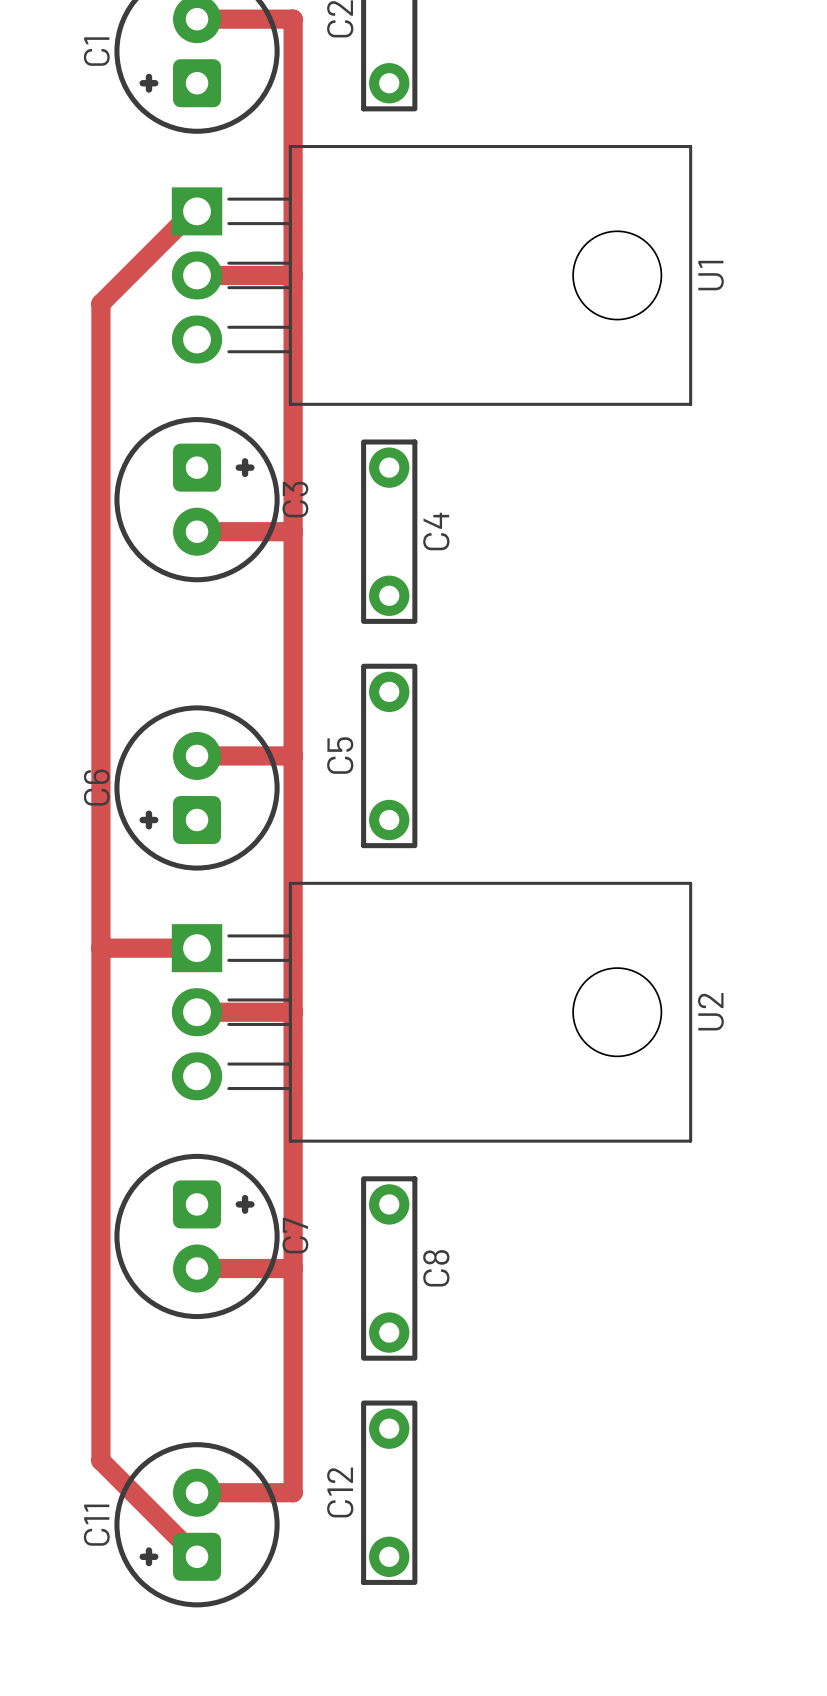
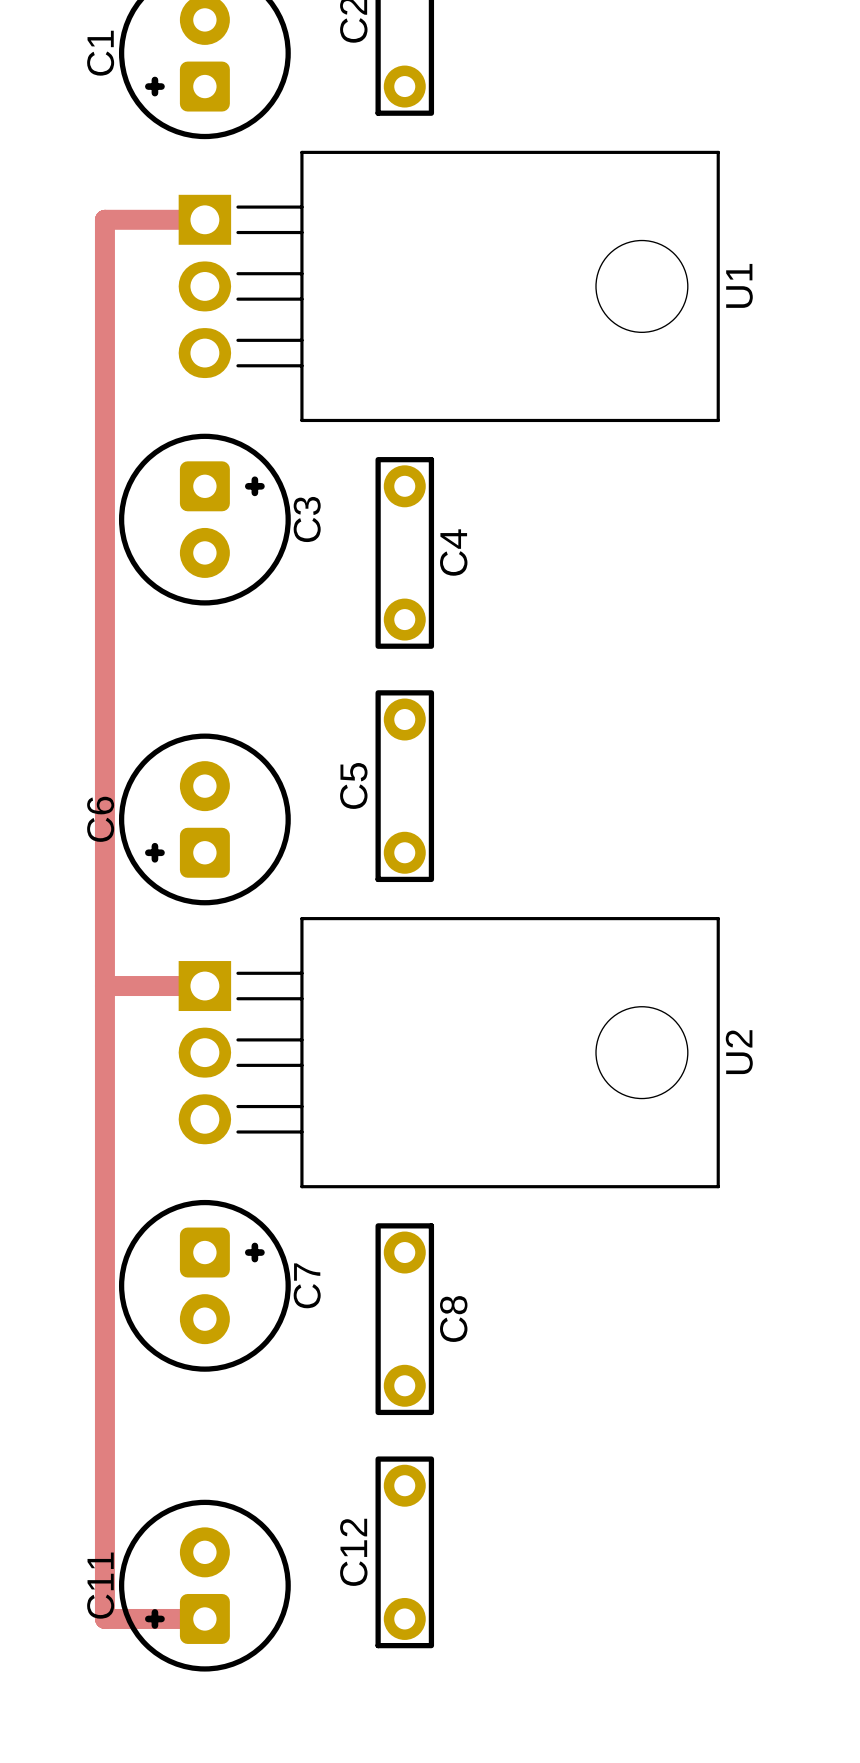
track: (197, 19) (293, 19) (293, 1492) (197, 1492) -> none
track: (193, 211) (100, 303) -> (200, 219) (104, 219) (104, 315)
track: (197, 275) (293, 275) -> none
track: (197, 531) (293, 531) -> none
track: (197, 755) (293, 755) -> none
track: (197, 1012) (293, 1012) -> none
track: (197, 1268) (293, 1268) -> none
track: (100, 1460) (197, 1556) -> (104, 1519) (104, 1618) (204, 1618)

